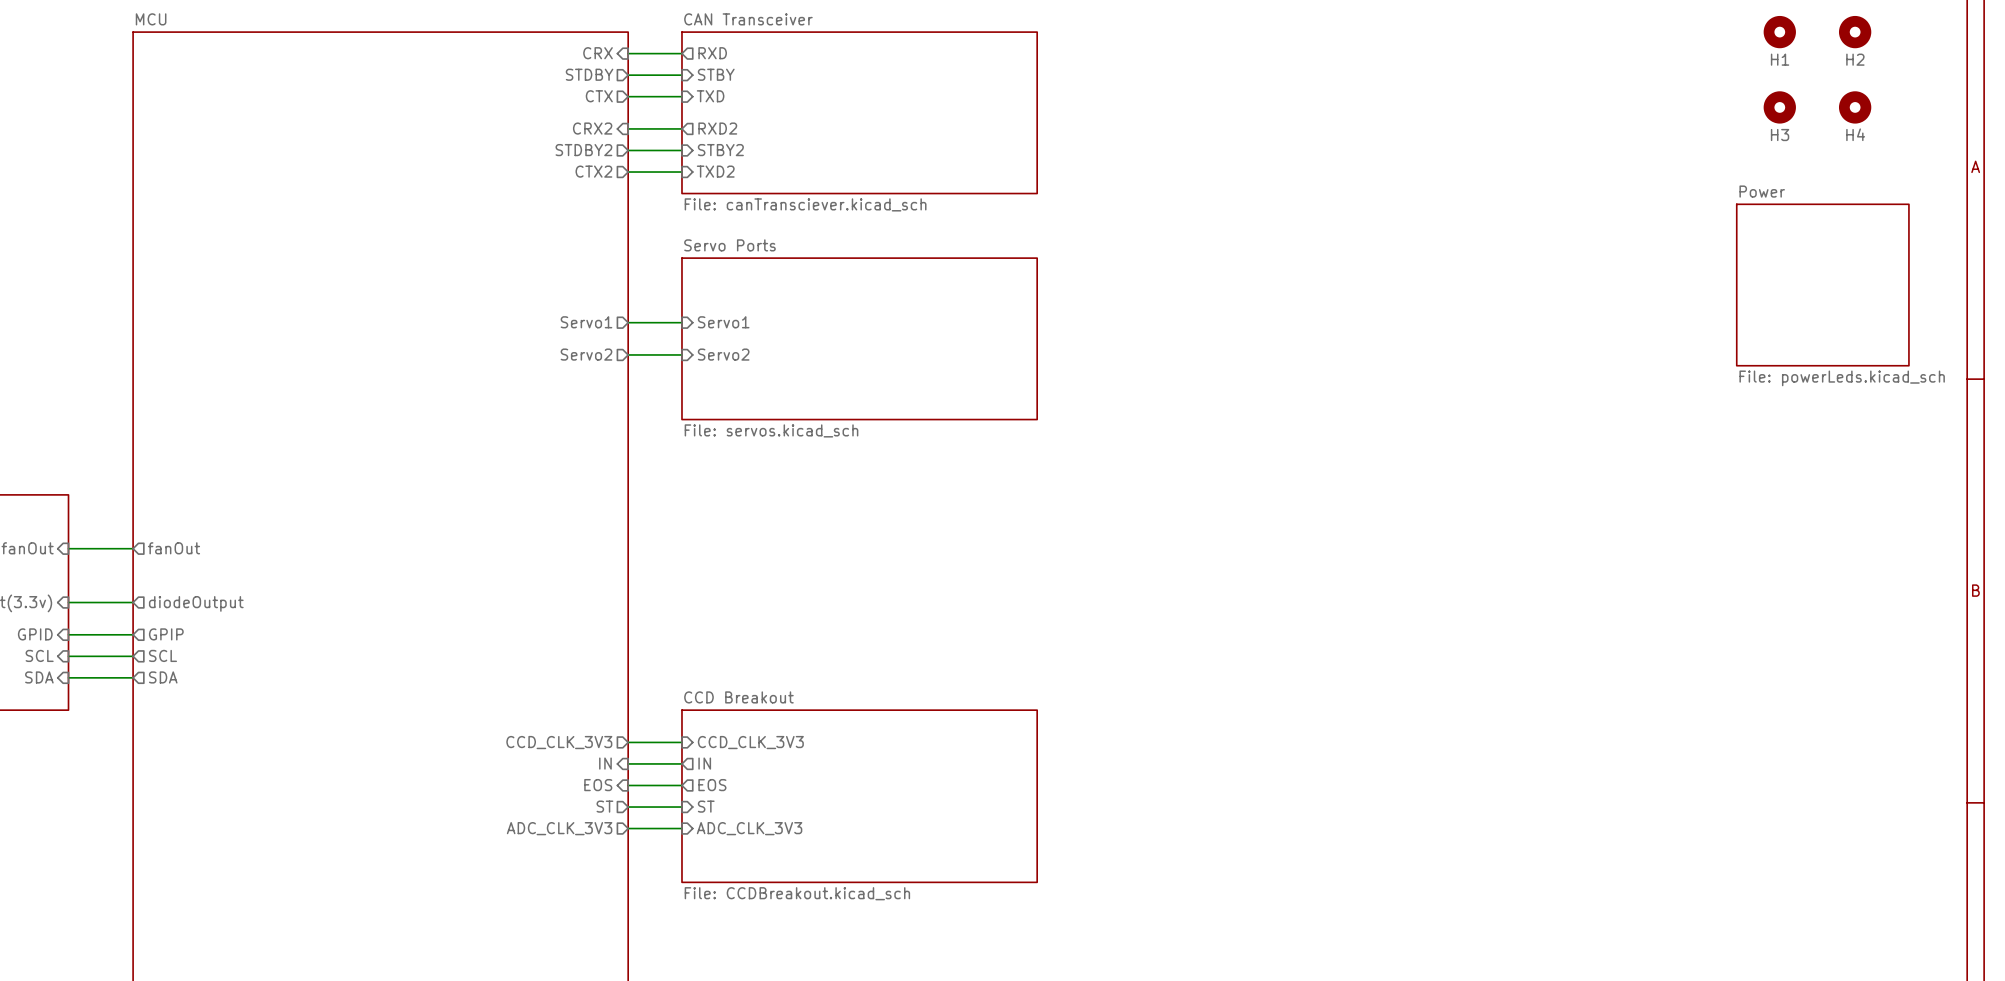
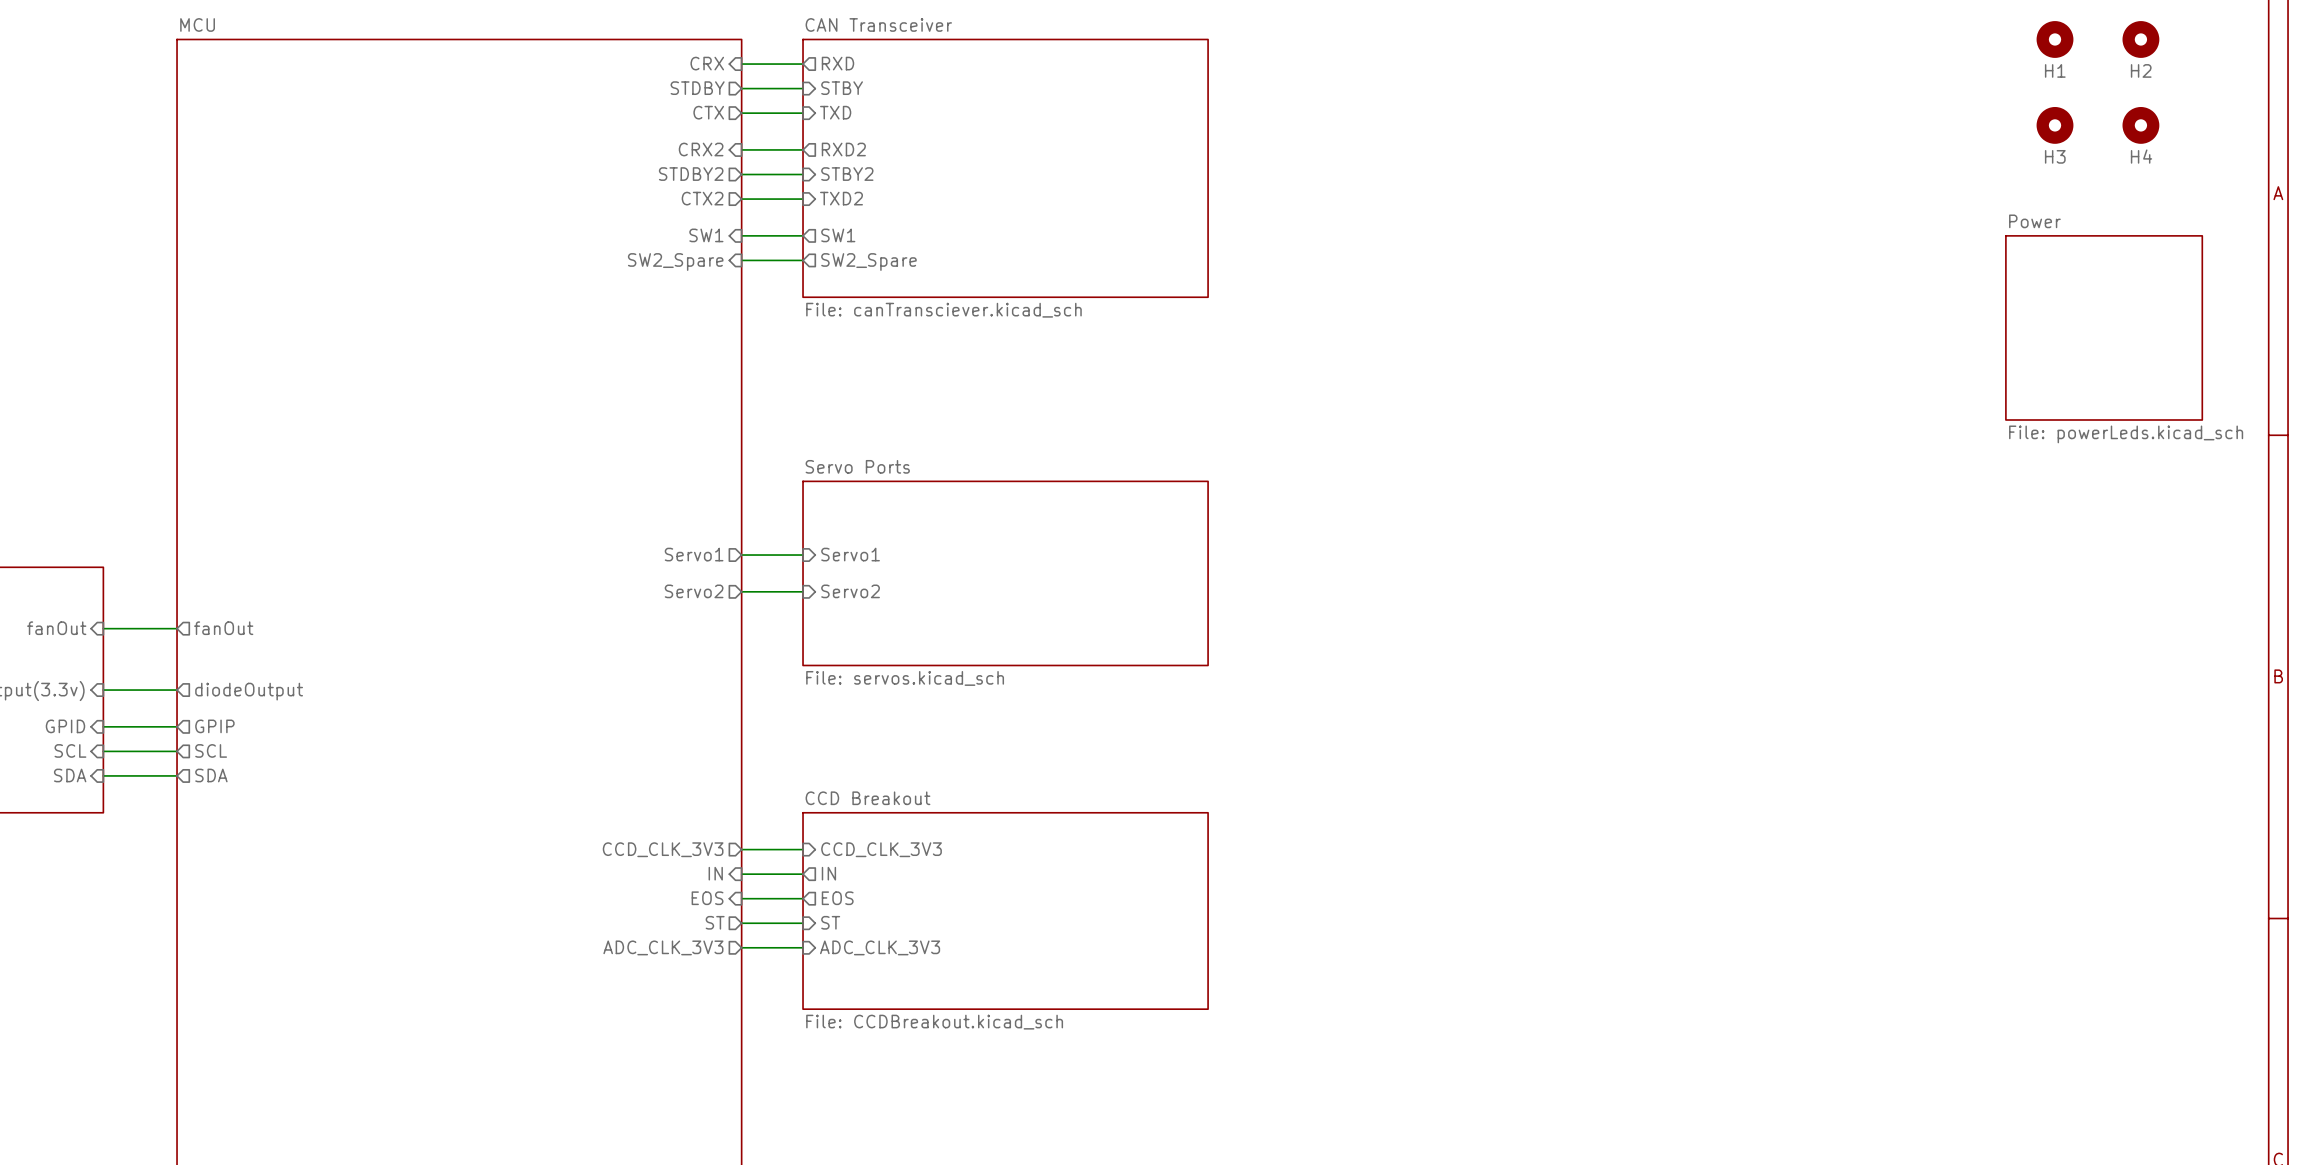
sheet CAN Transceiver: File: canTransciever.kicad_sch (859, 112) -> none
sheet CAN Transceiver: none -> File: canTransciever.kicad_sch (1005, 168)
sheet pin: none -> SW1 (706, 235)
sheet pin: none -> SW1 (838, 235)
wire: none -> (741, 235) (803, 235)
wire: none -> (741, 260) (803, 260)
sheet pin: none -> SW2_Spare (675, 262)
sheet pin: none -> SW2_Spare (868, 262)
sheet pin: Servo1 (586, 322) -> none
wire: (628, 322) (681, 322) -> (741, 555) (803, 555)
sheet pin: Servo1 (723, 322) -> none
sheet Servo Ports position: (859, 338) -> (1005, 573)
sheet pin: Servo2 (586, 354) -> none
wire: (628, 354) (681, 354) -> (741, 591) (803, 591)
sheet pin: Servo2 (723, 354) -> none
sheet pin: none -> Servo1 (694, 554)
sheet pin: none -> Servo1 (850, 554)
sheet pin: none -> Servo2 (694, 591)
sheet pin: none -> Servo2 (850, 591)

